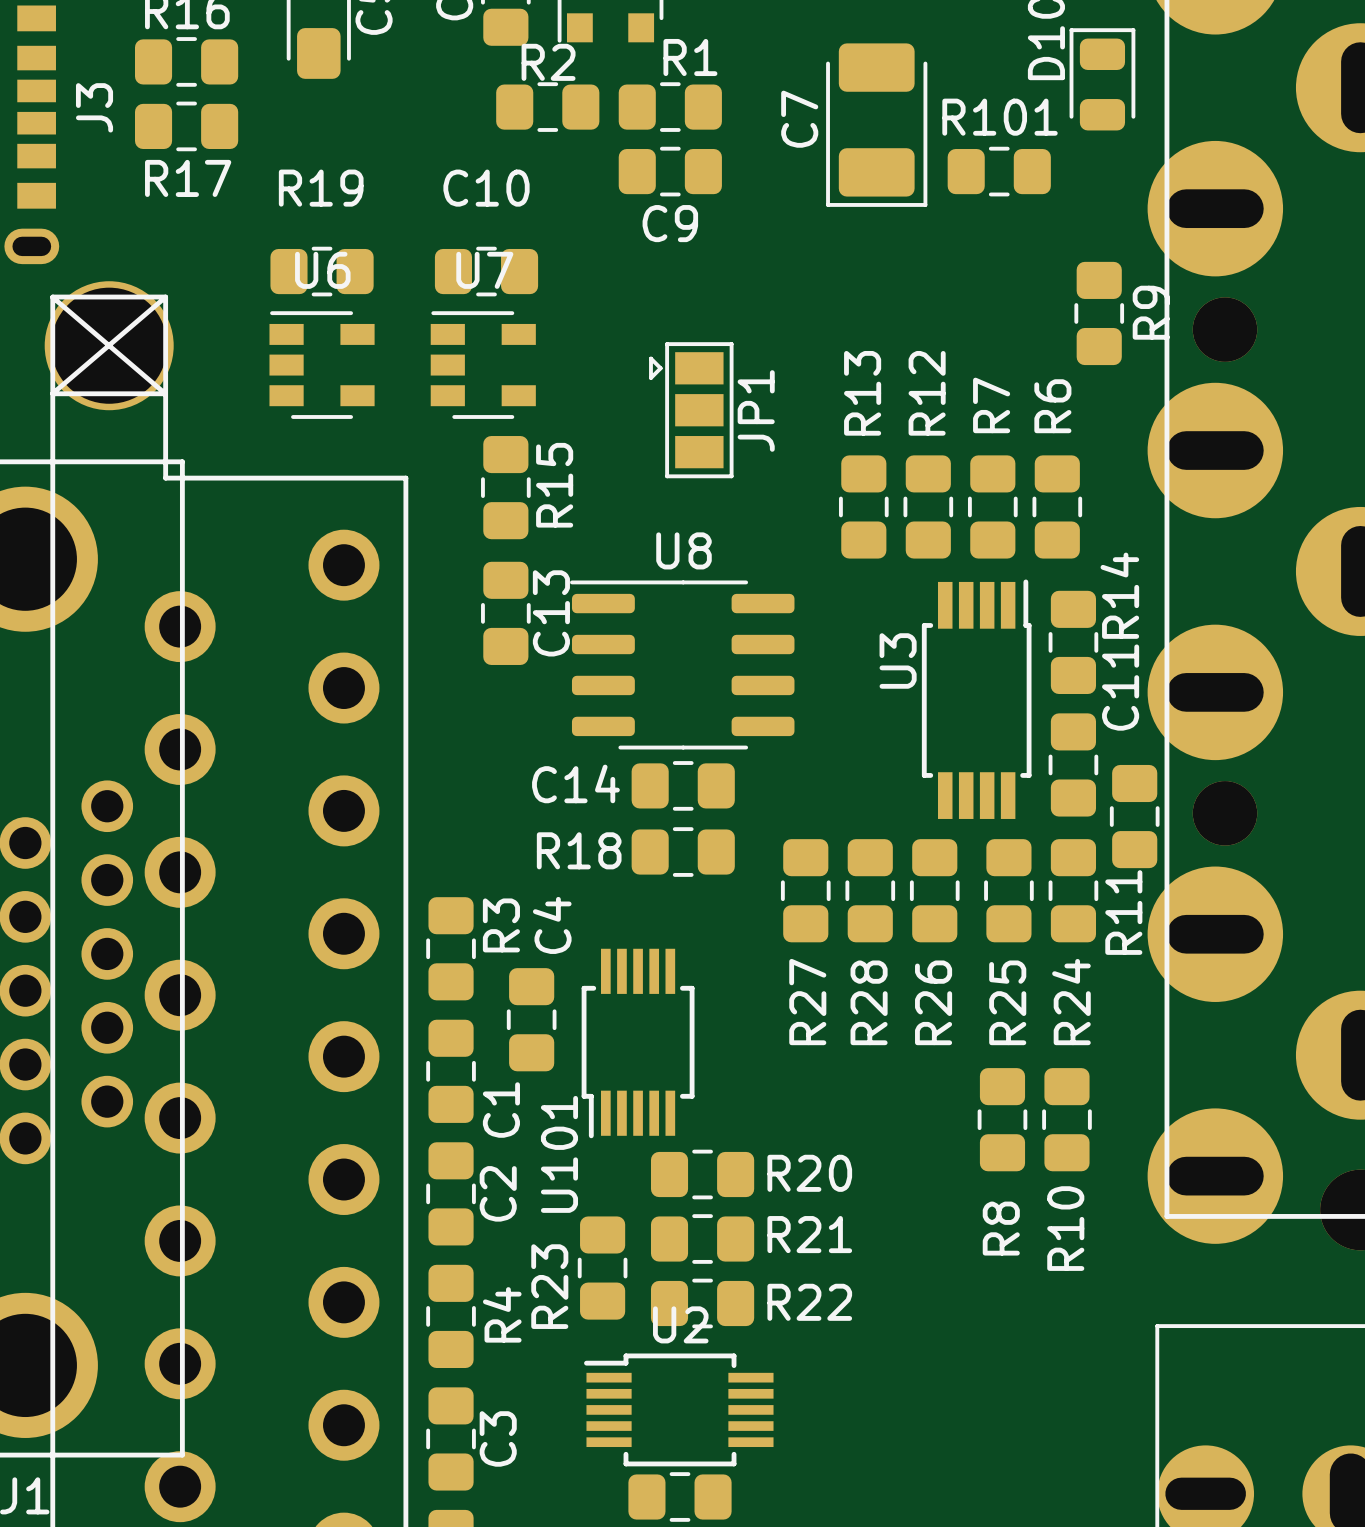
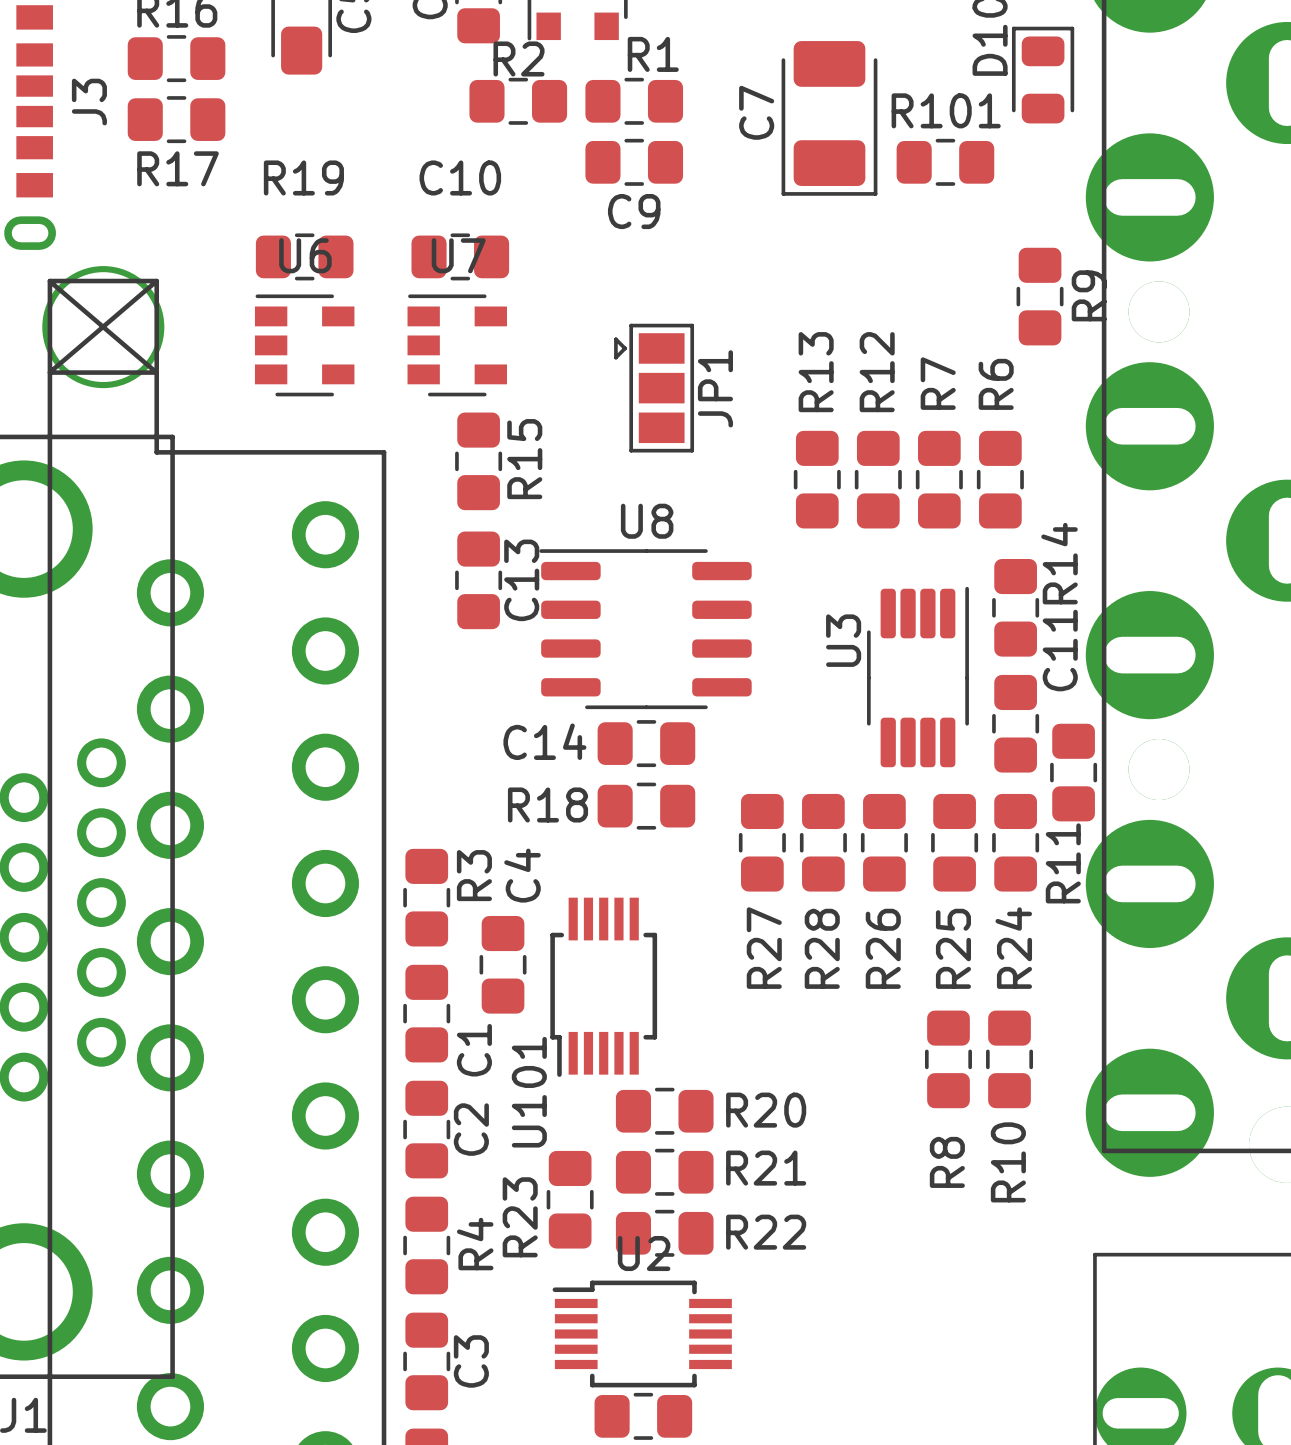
U3 footprint: [921, 579, 1032, 819] -> [867, 586, 969, 768]

